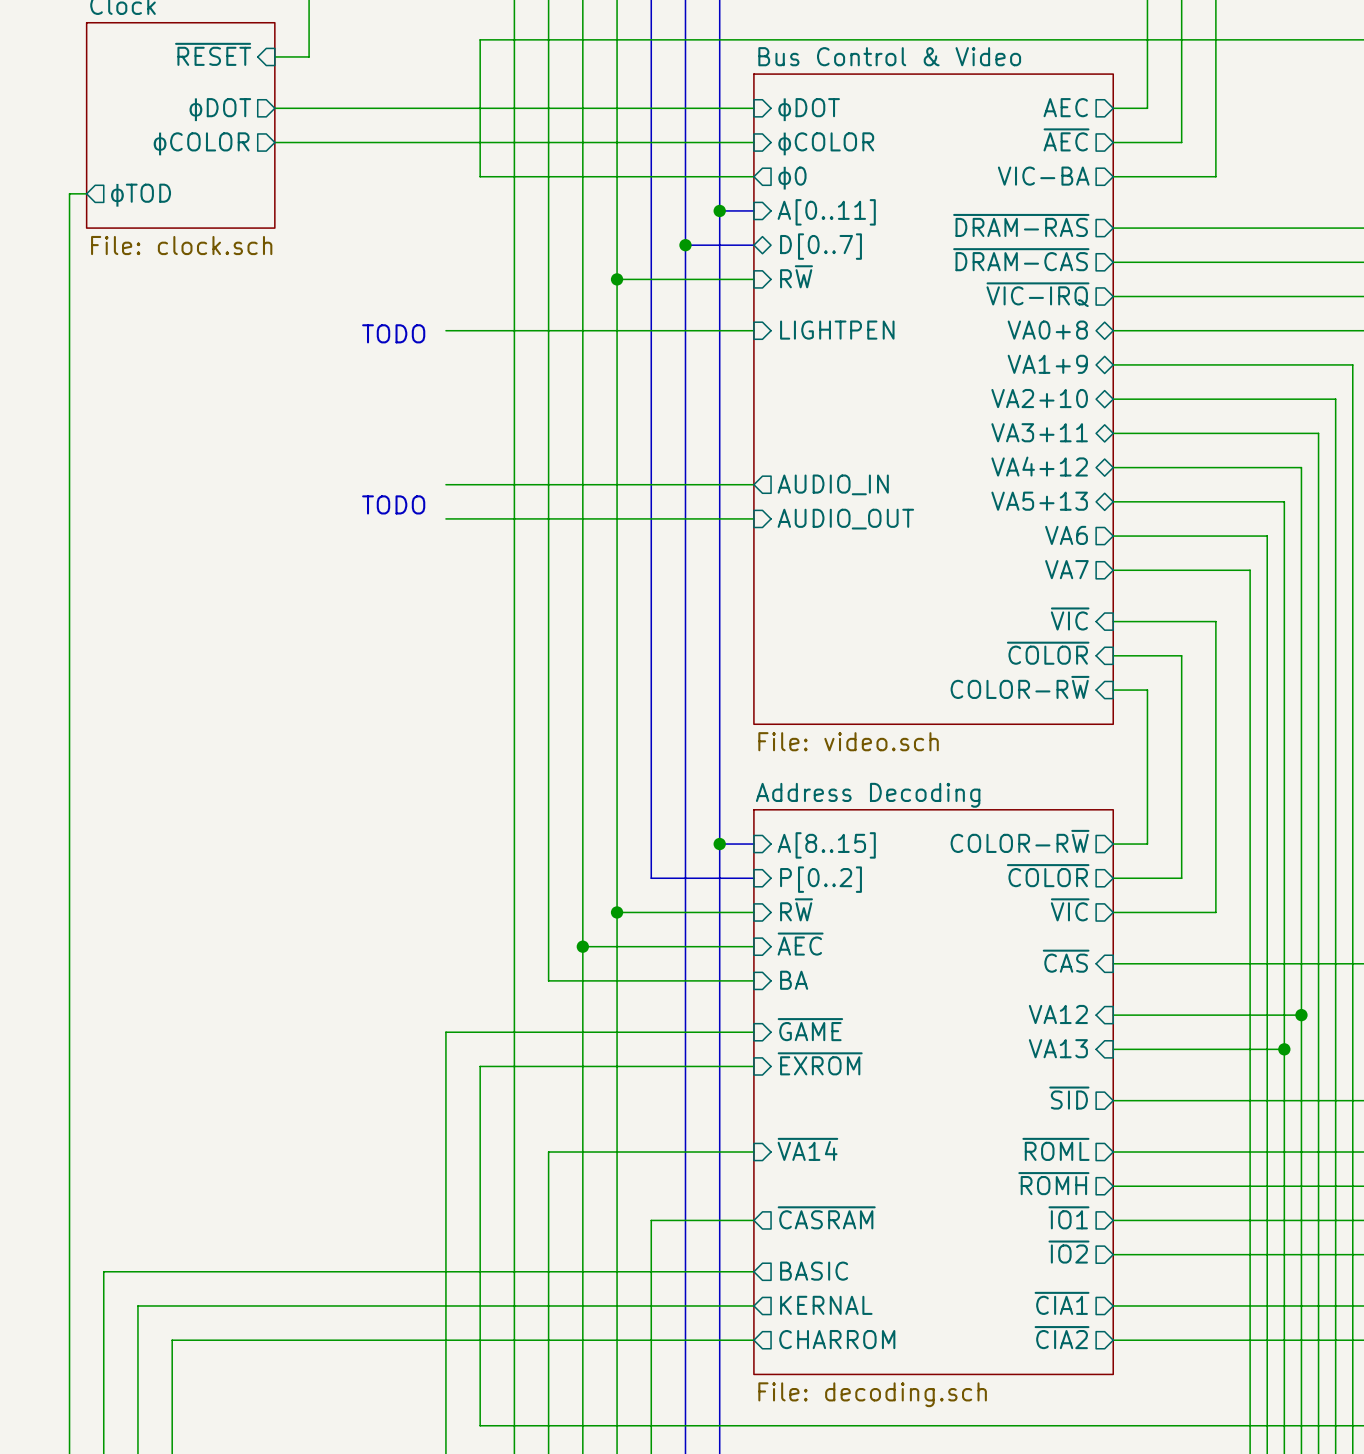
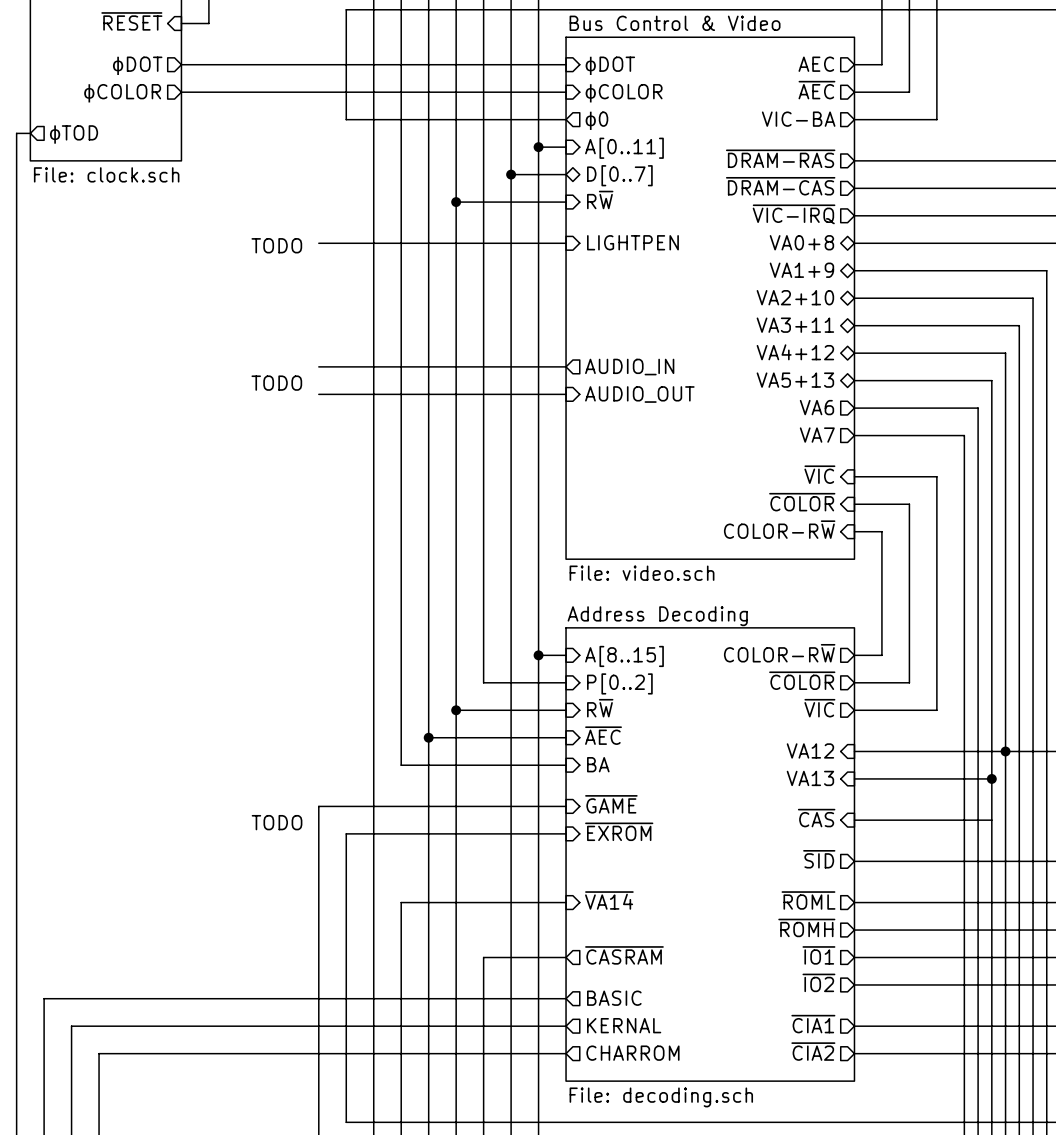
sheet pin: ~{CAS} (1066, 961) -> VA12 (810, 750)
junction: none -> (1005, 751)
wire: none -> (854, 778) (991, 778)
sheet pin: VA12 (1058, 1014) -> VA13 (810, 778)
wire: (1113, 1015) (1301, 1015) -> none
junction position: (1301, 1015) -> (991, 778)
sheet pin: VA13 (1058, 1048) -> ~{CAS} (816, 818)
junction: (1284, 1049) -> none
text: none -> TODO (277, 822)

